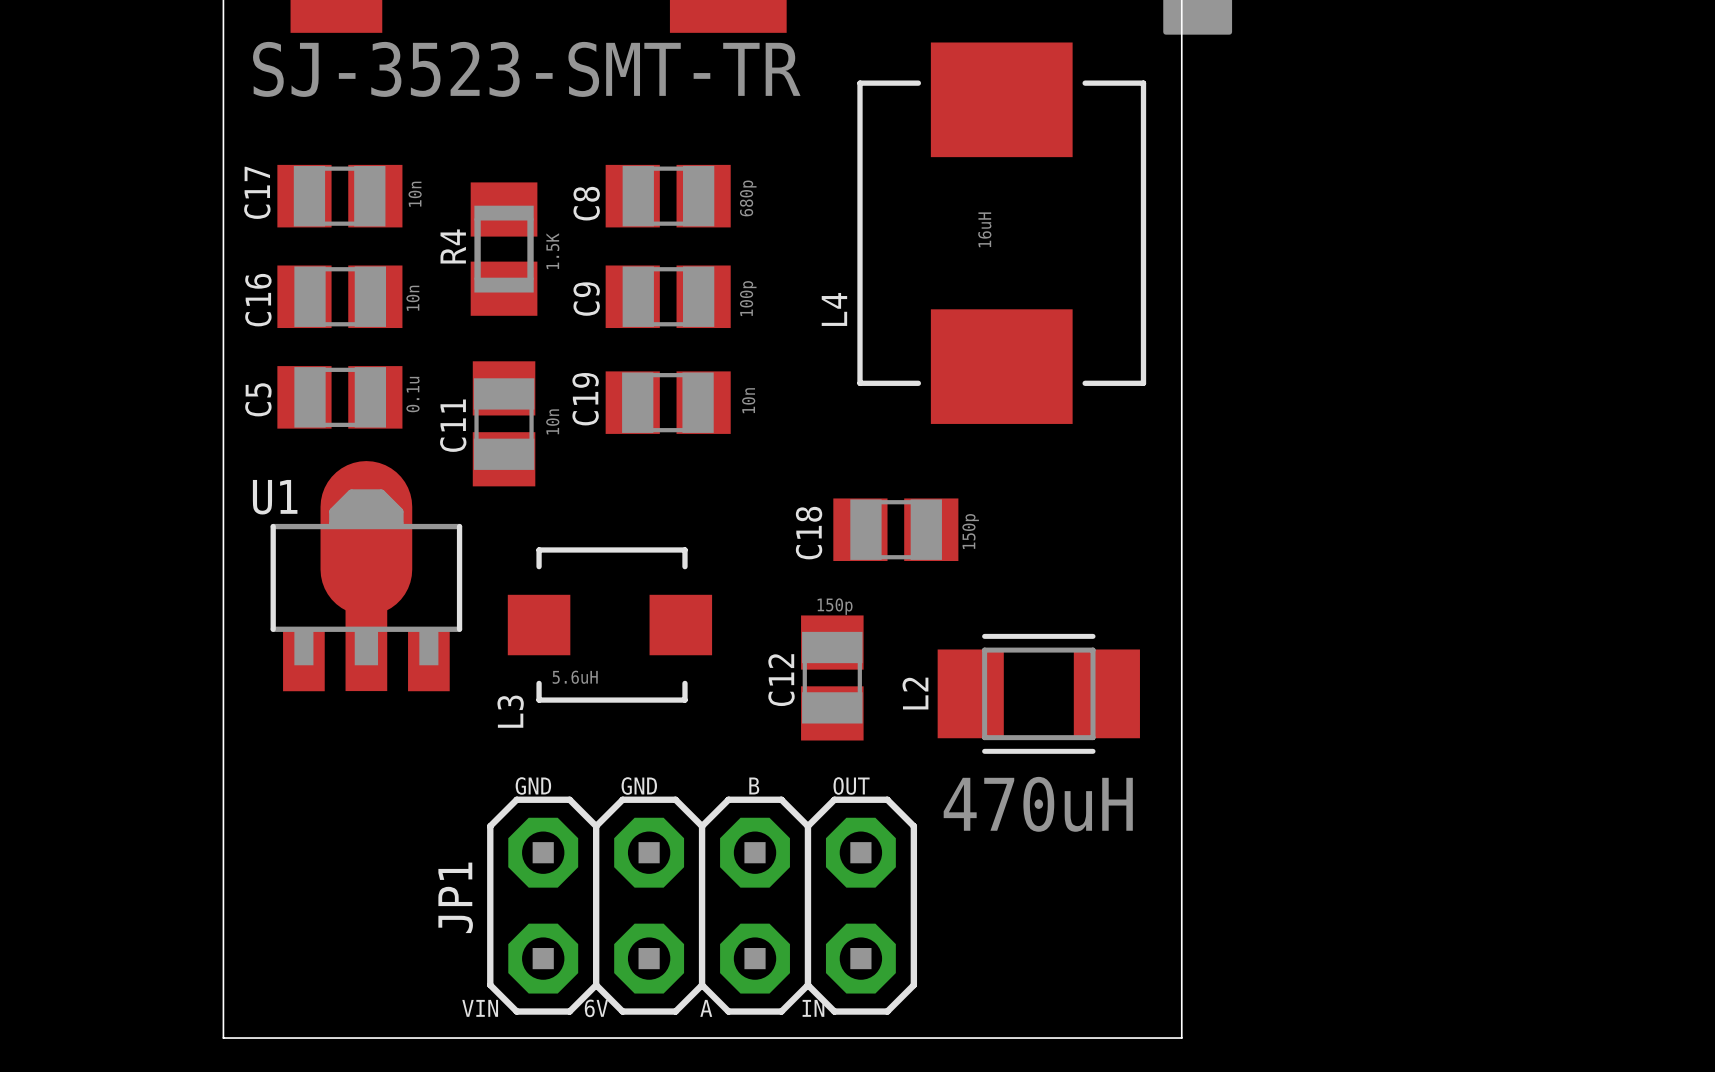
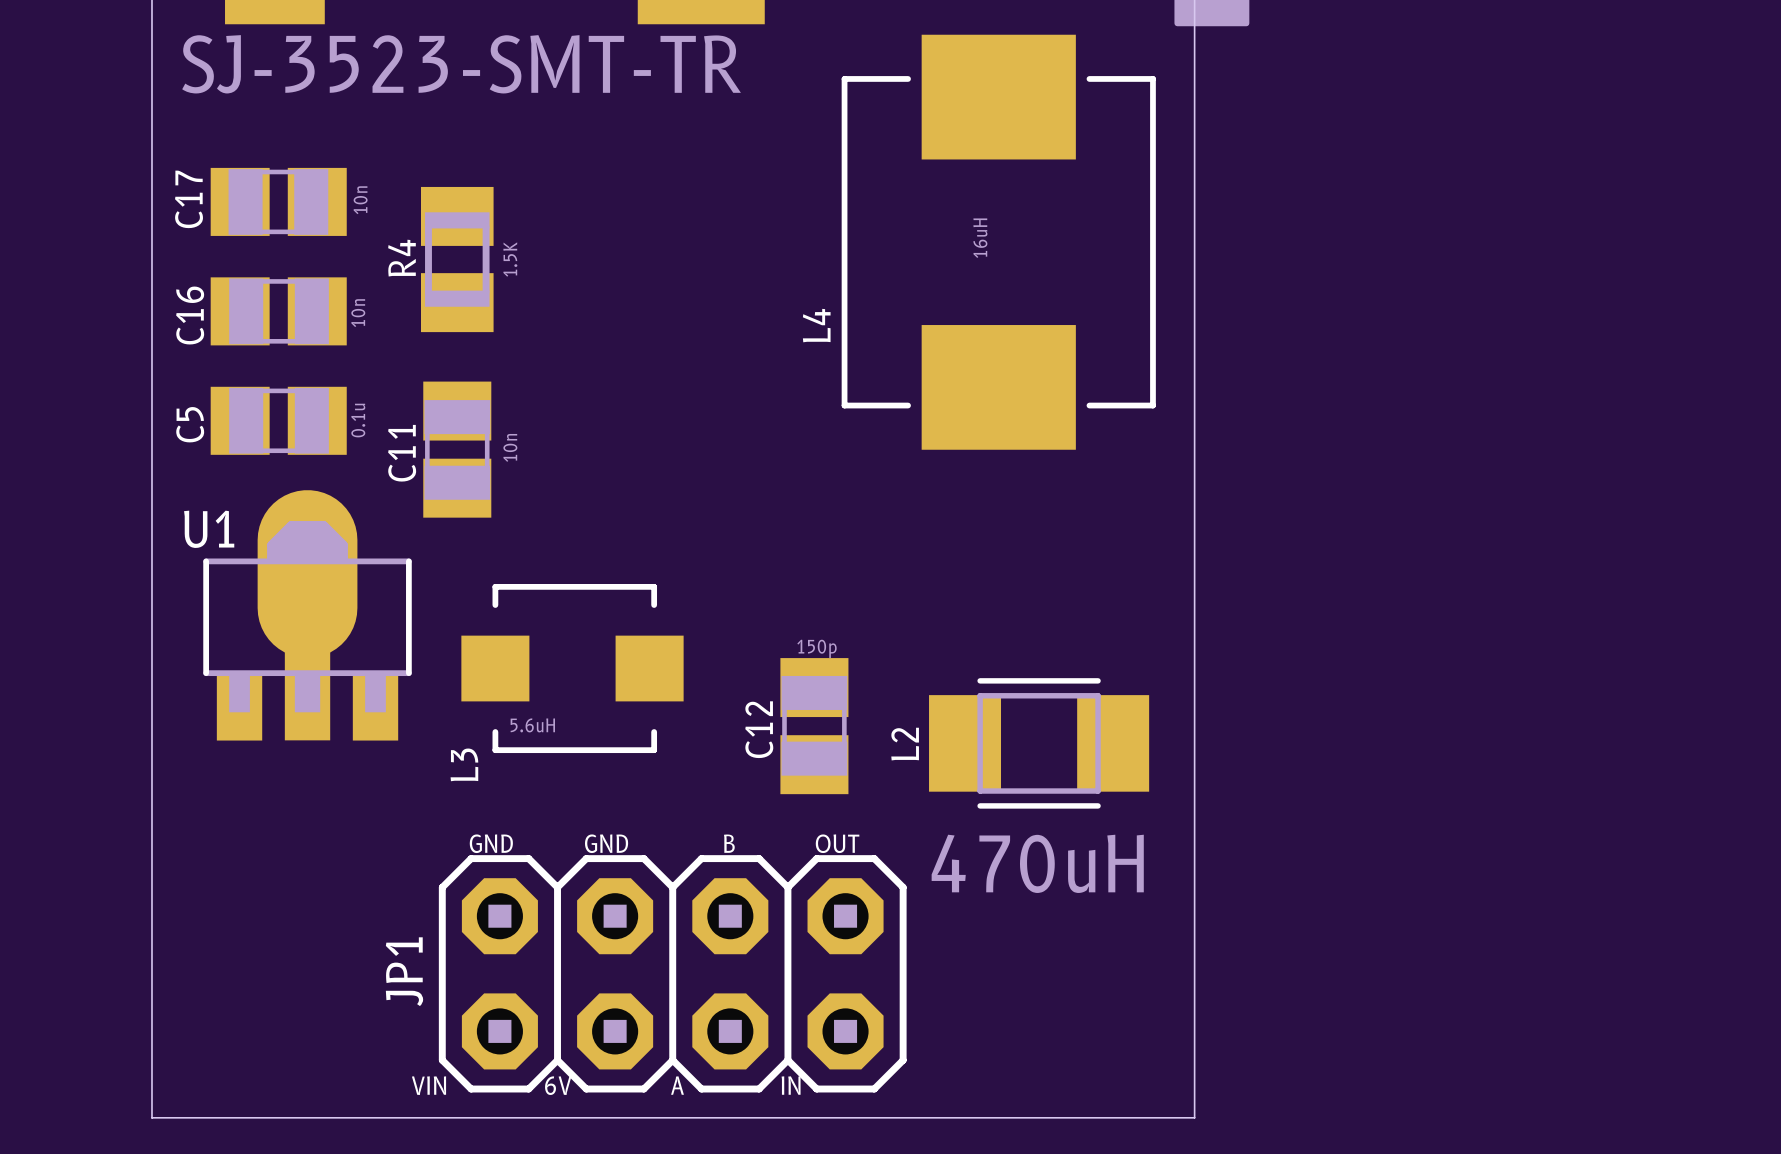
C8: 680p (668, 196) -> none
C9: 100p (668, 296) -> none
C19: 10n (668, 402) -> none
C18: 150p (895, 529) -> none

